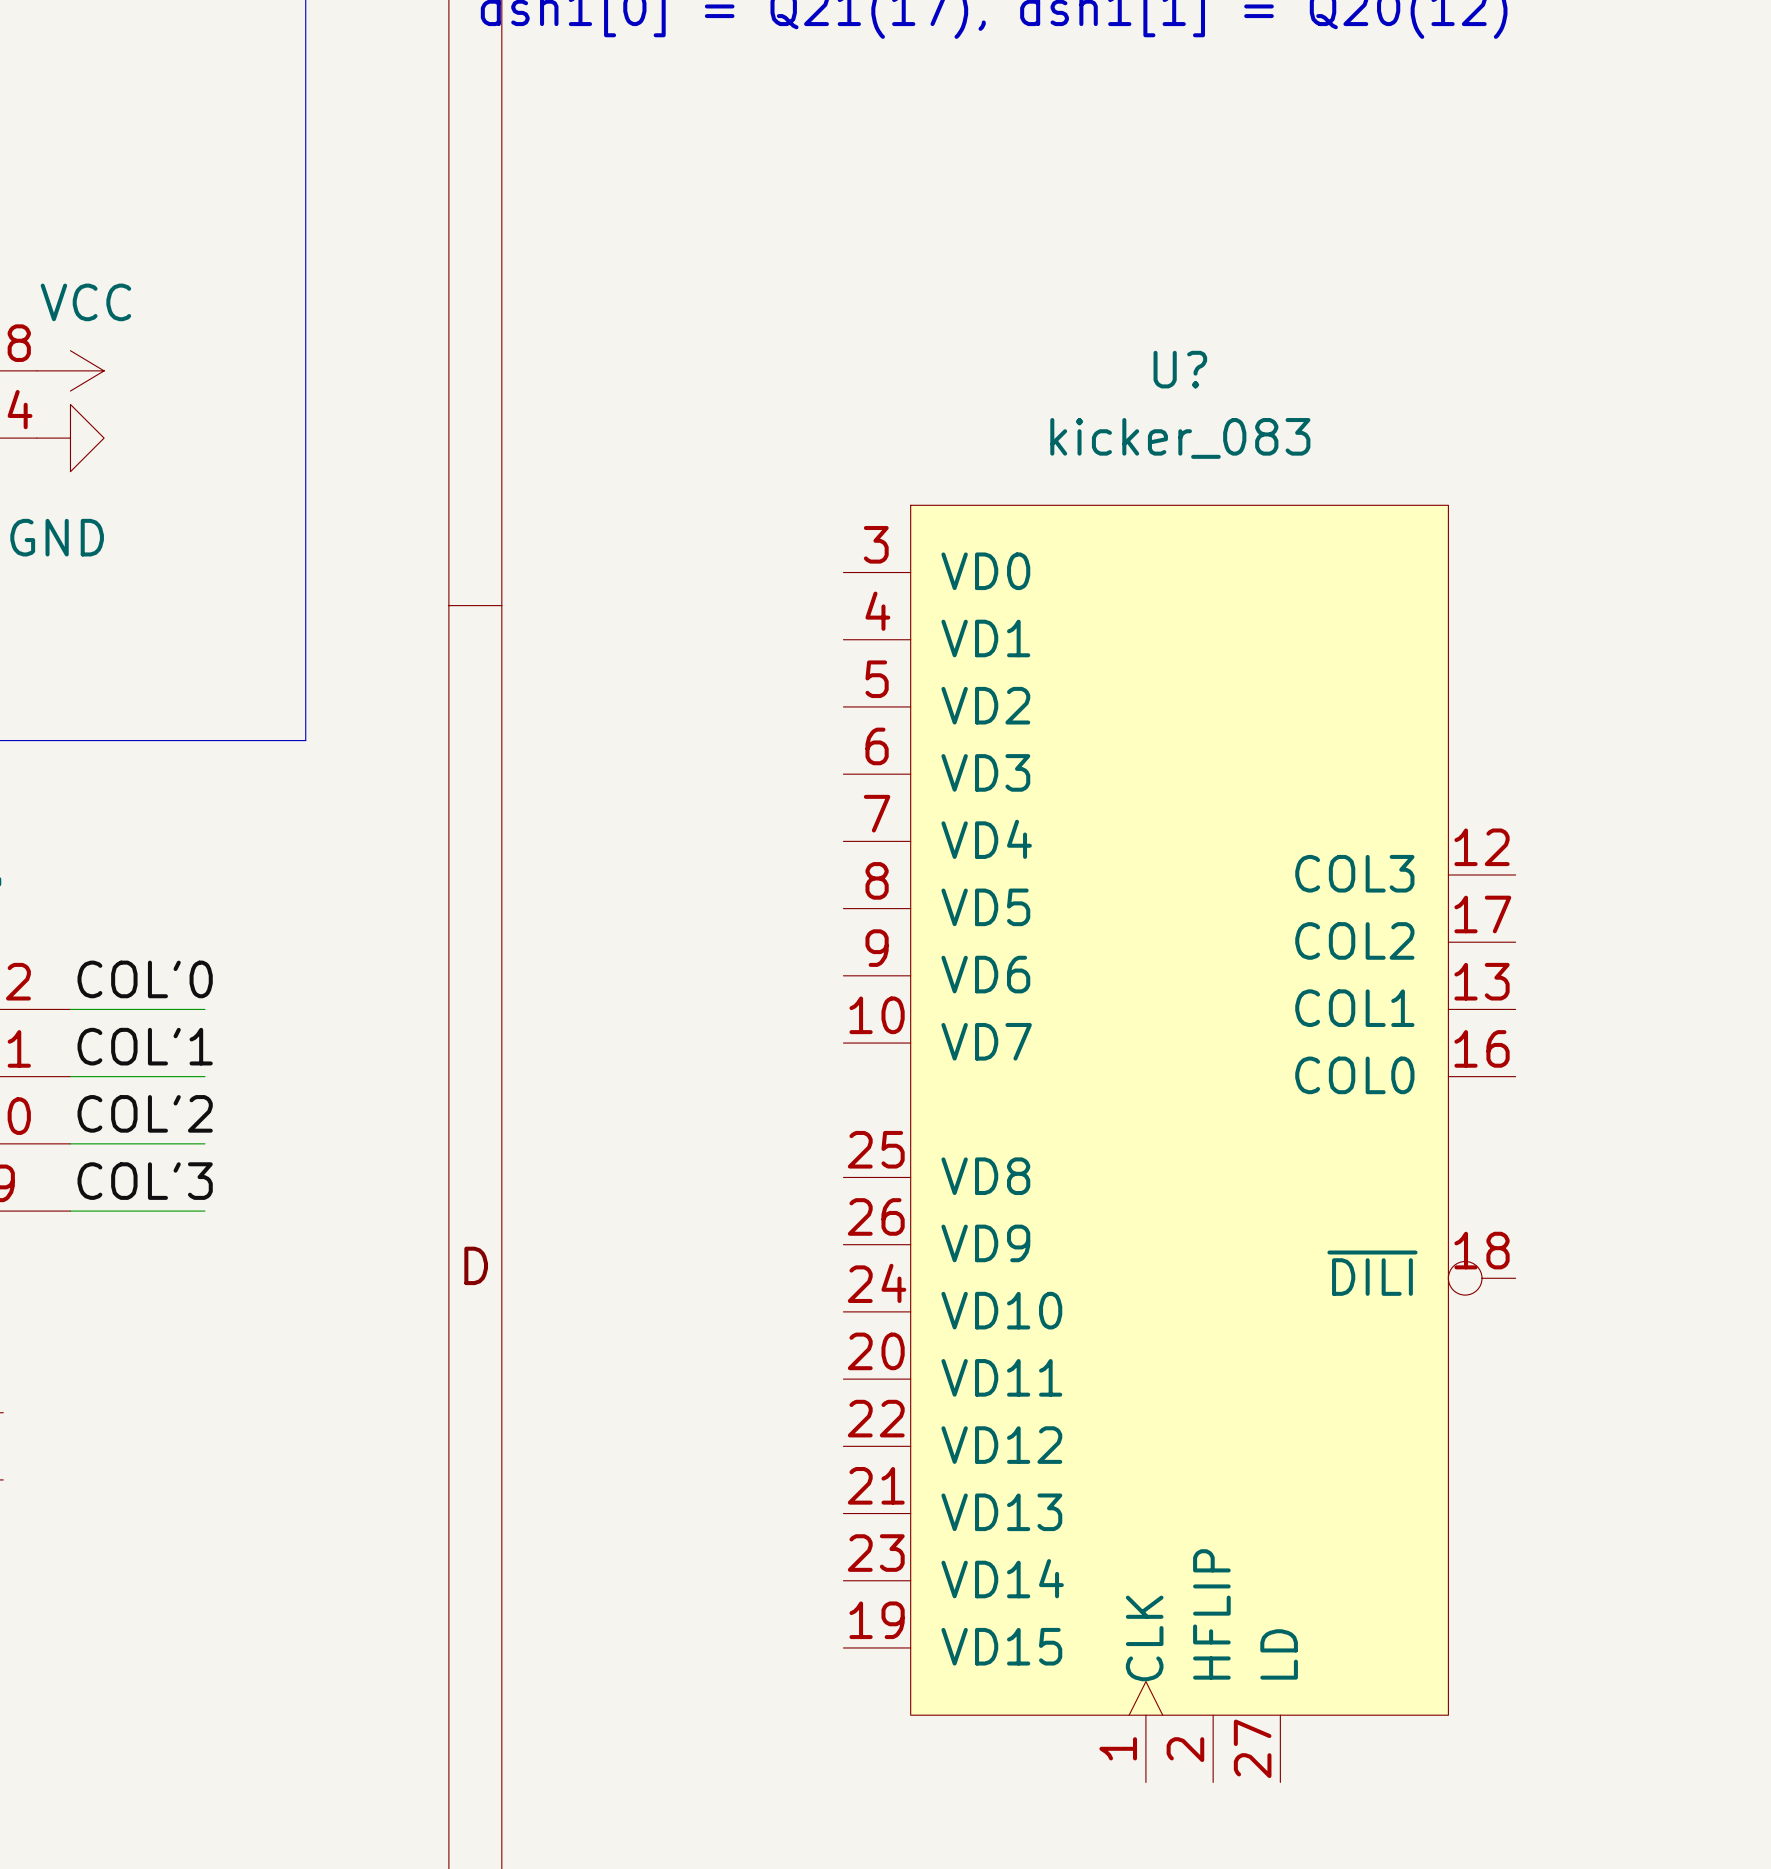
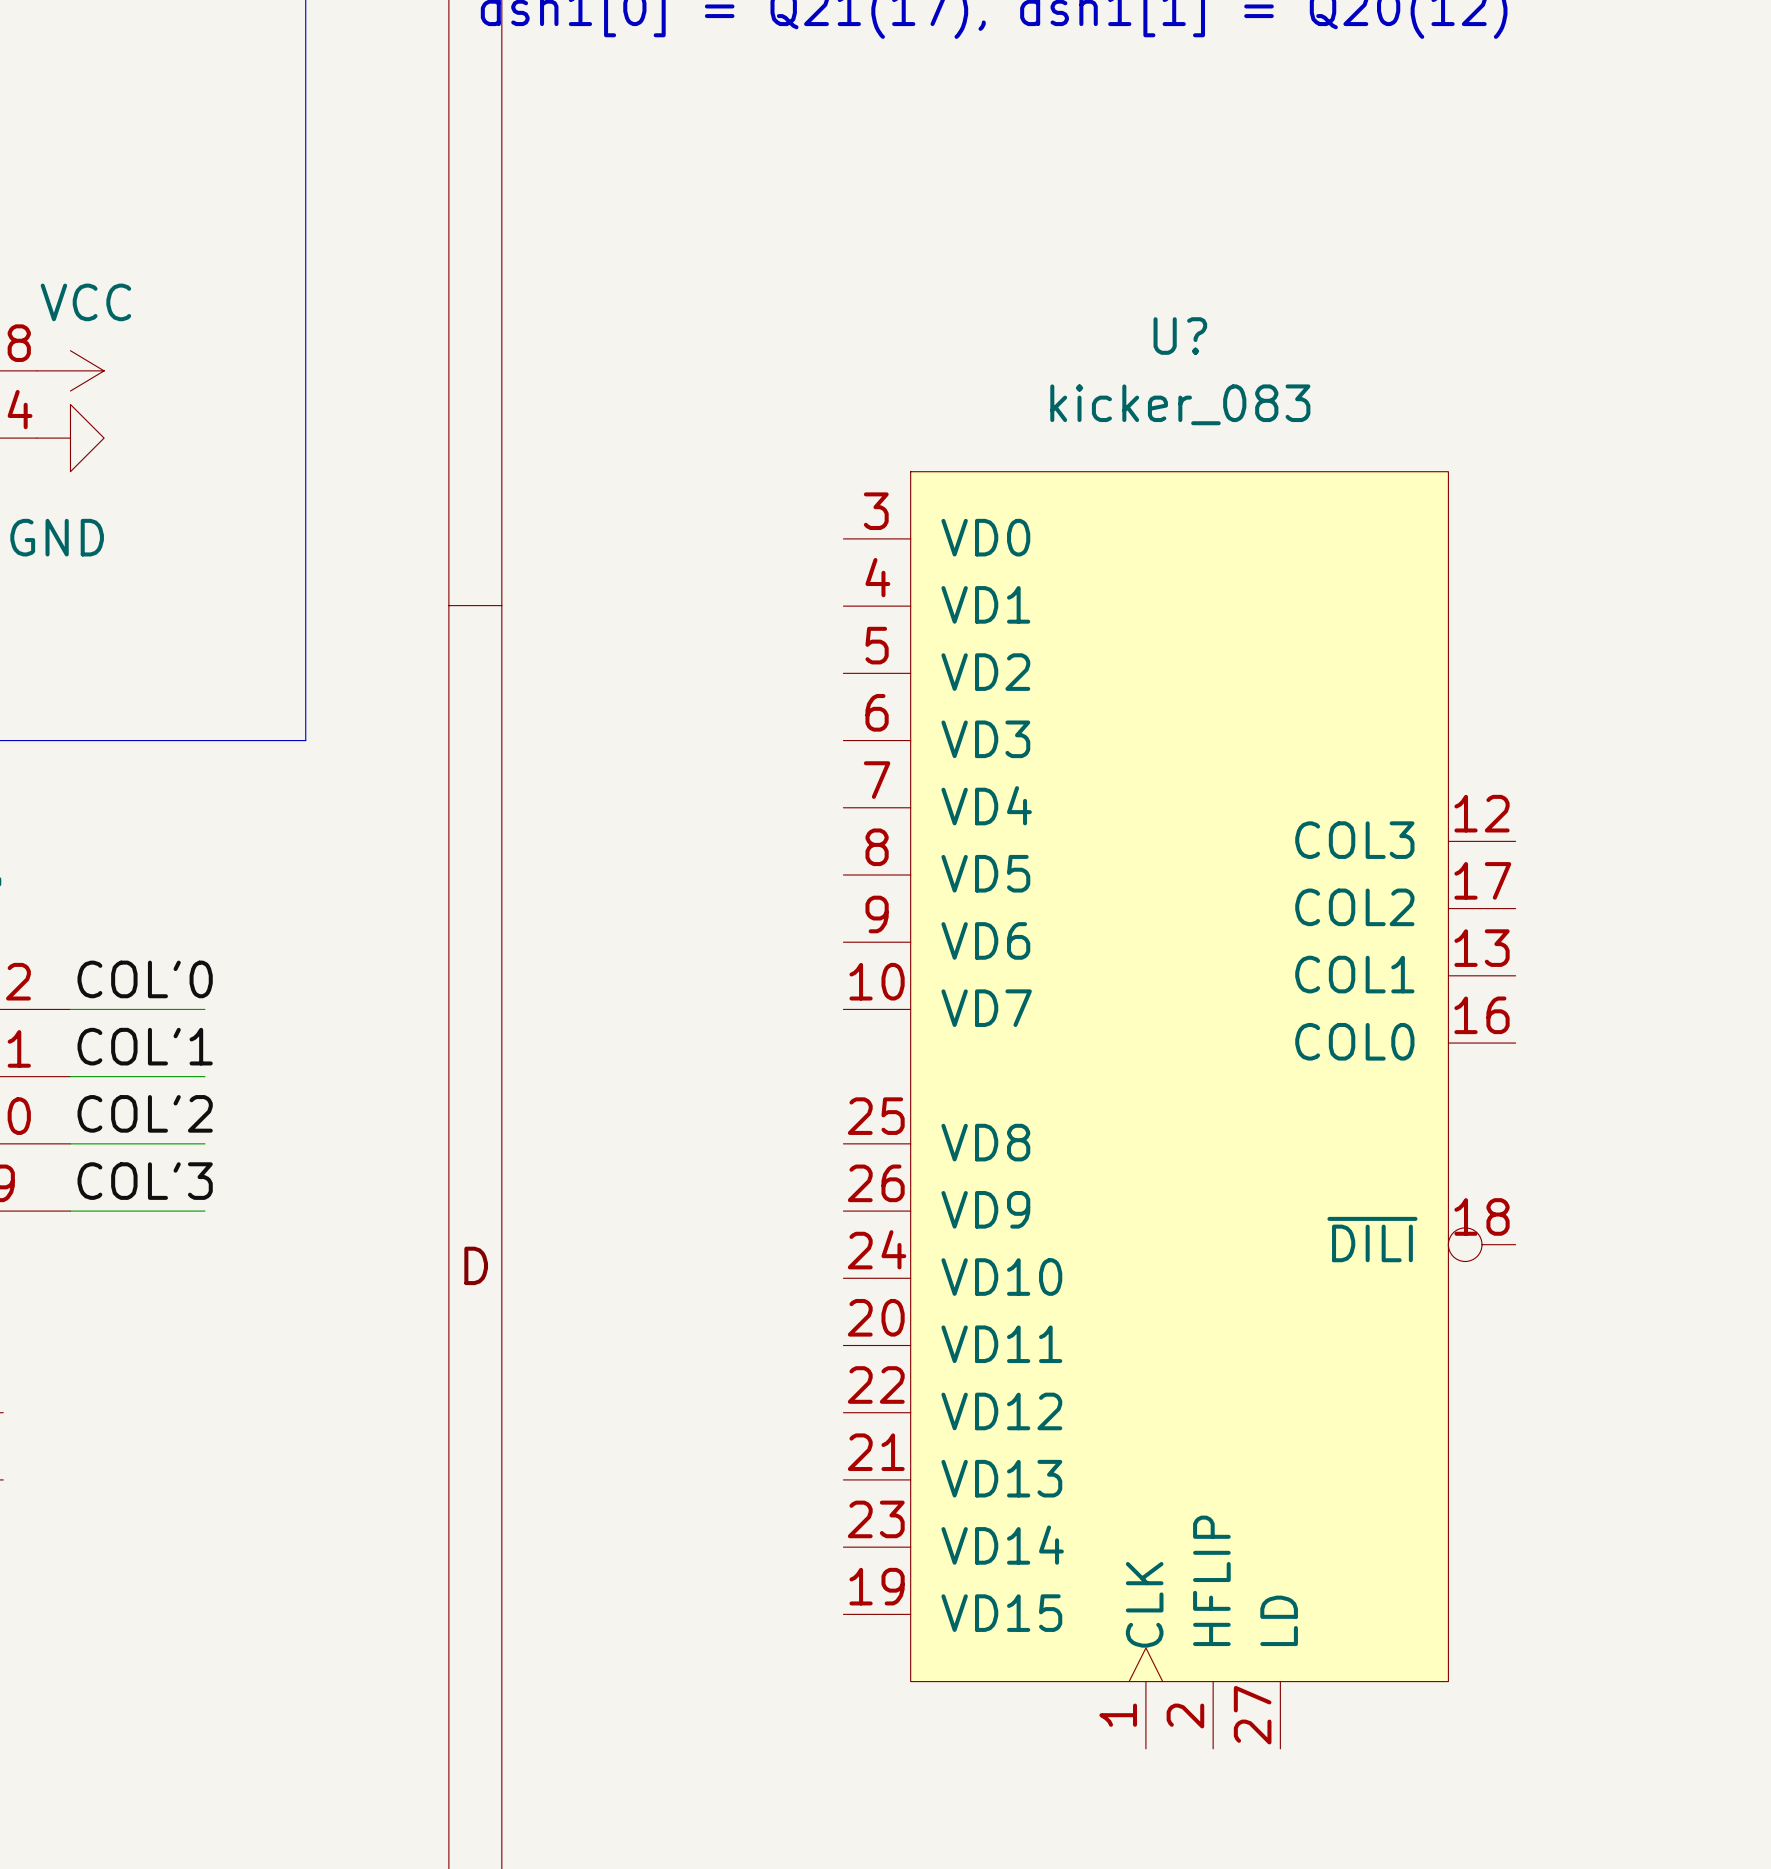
U? position: (1179, 1143) -> (1179, 1110)

